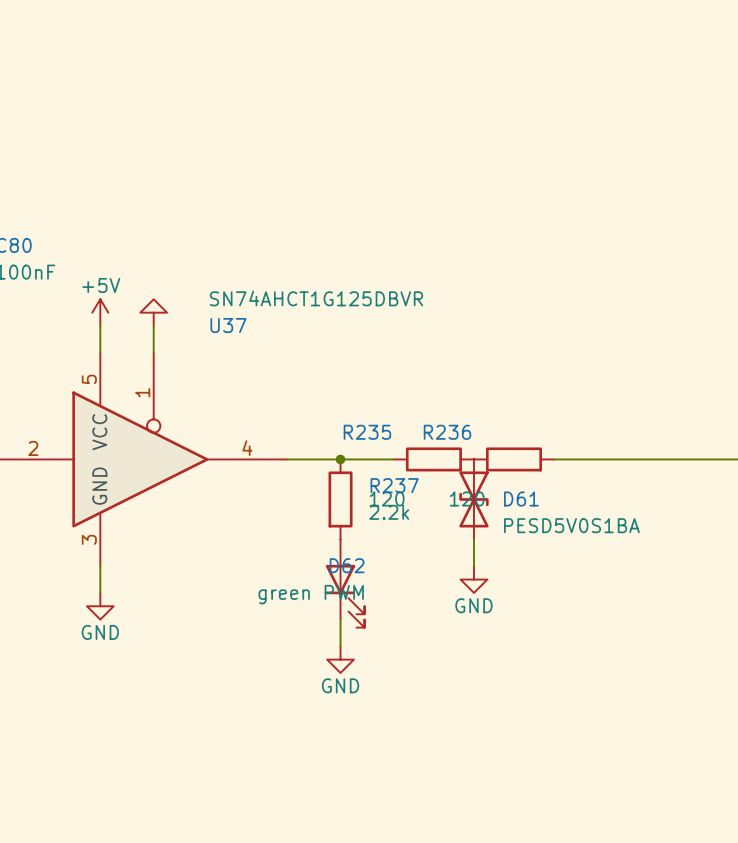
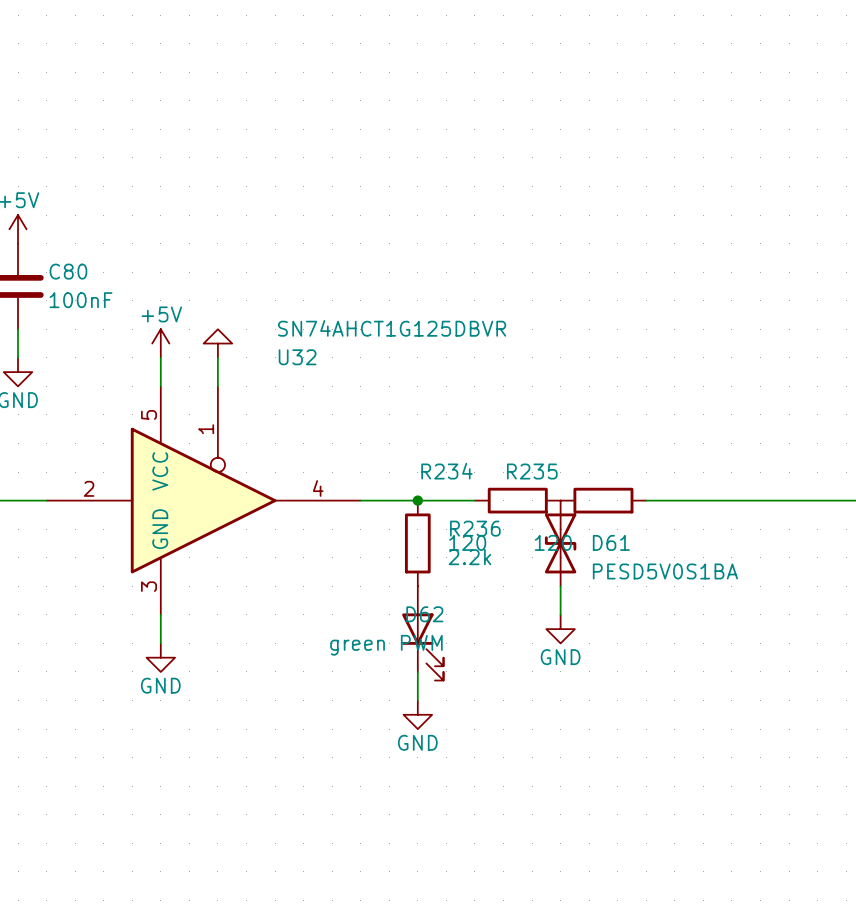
U37 name: U37 (228, 325) -> U32 (297, 357)
R235 name: R235 (367, 432) -> R234 (446, 471)
R236 name: R236 (447, 432) -> R235 (532, 471)
R237 name: R237 (394, 485) -> R236 (475, 528)

